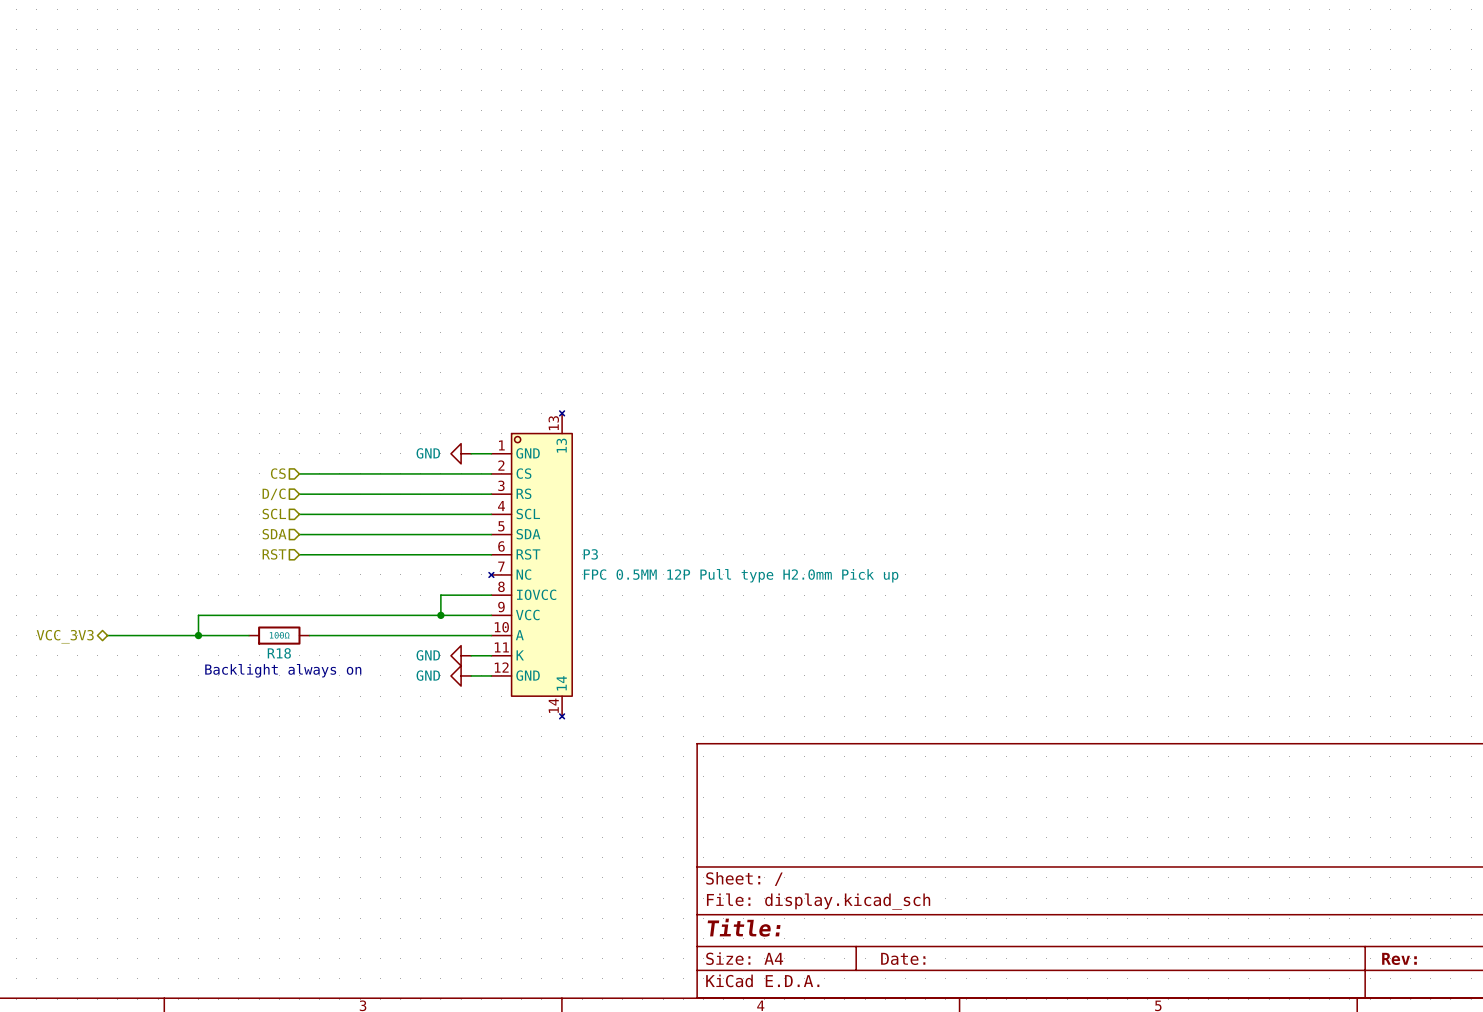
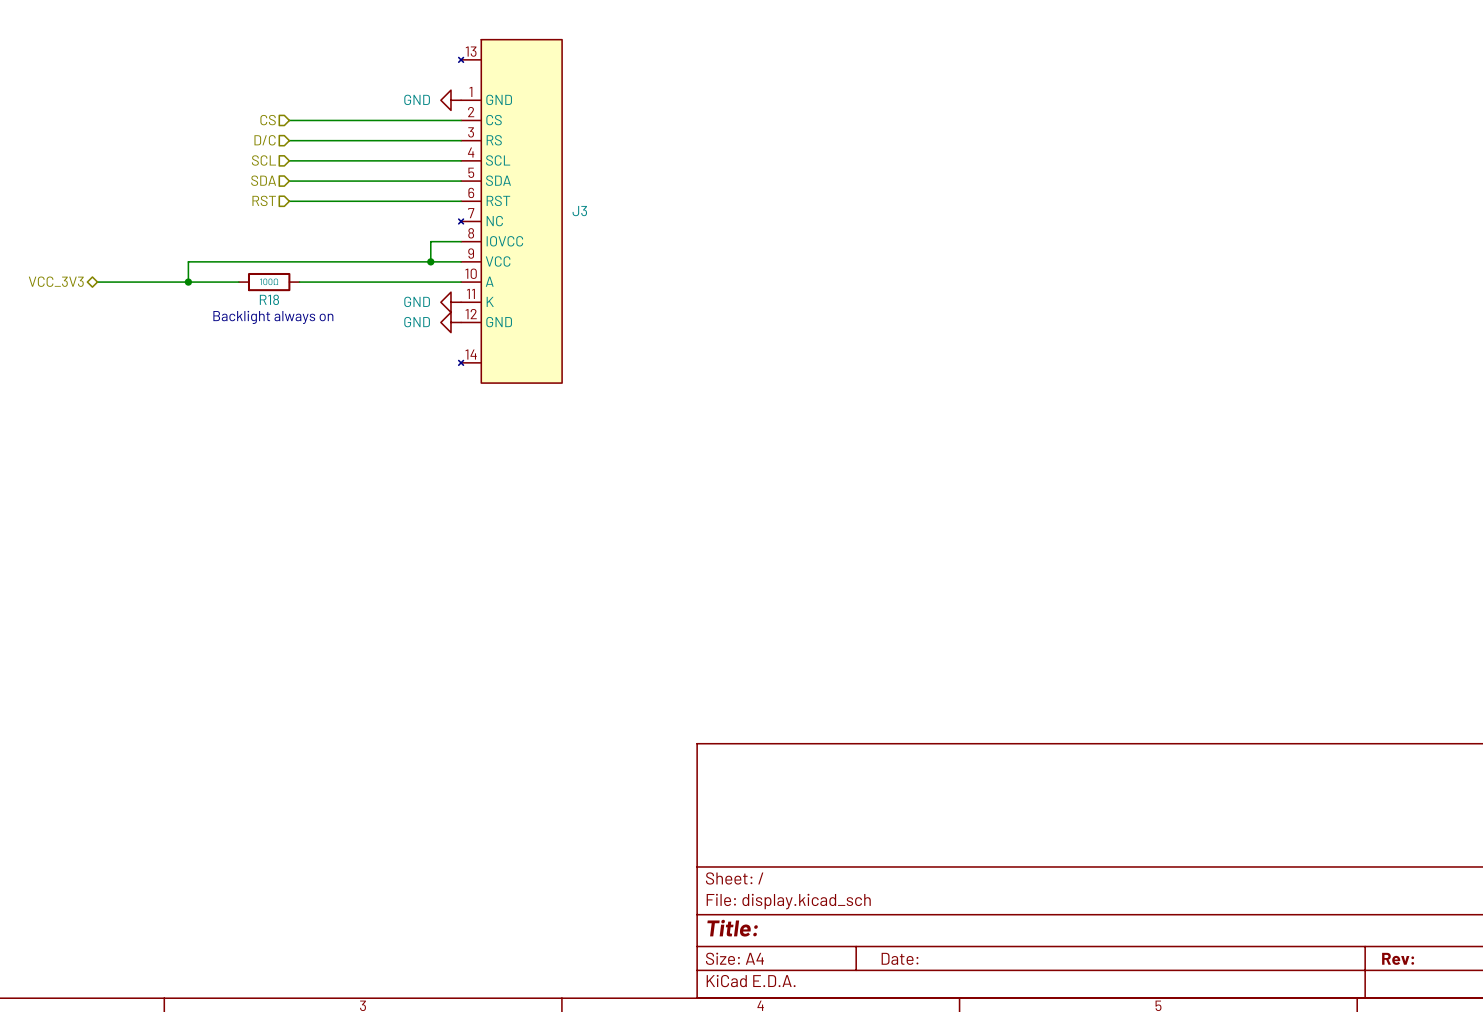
power symbol: none -> GND (450, 100)
hierarchical label: none -> CS (268, 120)
wire: none -> (289, 120) (461, 120)
hierarchical label: none -> D/C (265, 140)
wire: none -> (289, 140) (461, 140)
hierarchical label: none -> SCL (263, 160)
wire: none -> (289, 160) (461, 160)
hierarchical label: none -> SDA (263, 180)
wire: none -> (289, 181) (461, 181)
hierarchical label: none -> RST (264, 200)
wire: none -> (289, 201) (461, 201)
J3: none -> (510, 211)
wire: none -> (461, 241) (430, 241) (430, 261)
junction: none -> (430, 261)
wire: none -> (461, 261) (188, 261) (188, 282)
wire: none -> (97, 282) (238, 282)
junction: none -> (188, 282)
wire: none -> (299, 282) (461, 282)
hierarchical label: none -> VCC_3V3 (56, 281)
power symbol: none -> GND (450, 302)
text: none -> Backlight always on (273, 317)
power symbol: none -> GND (450, 322)
power symbol: GND (461, 453) -> none
wire: (471, 453) (491, 453) -> none
hierarchical label: CS (278, 473) -> none
wire: (299, 473) (491, 473) -> none
hierarchical label: D/C (274, 494) -> none
wire: (299, 494) (491, 494) -> none
hierarchical label: SCL (274, 513) -> none
wire: (299, 514) (491, 514) -> none
hierarchical label: SDA (274, 534) -> none
wire: (299, 534) (491, 534) -> none
hierarchical label: RST (274, 554) -> none
wire: (299, 554) (491, 554) -> none
P3: FPC 0.5MM 12P Pull type H2.0mm Pick up (530, 564) -> none
wire: (491, 595) (440, 595) (440, 615) -> none
junction: (440, 615) -> none
wire: (491, 615) (198, 615) (198, 635) -> none
wire: (107, 635) (248, 635) -> none
junction: (198, 635) -> none
R18 position: (279, 635) -> (269, 282)
wire: (309, 635) (491, 635) -> none
hierarchical label: VCC_3V3 (65, 636) -> none
power symbol: GND (461, 655) -> none
wire: (471, 655) (491, 655) -> none
text: Backlight always on (283, 670) -> none
power symbol: GND (461, 675) -> none
wire: (471, 675) (491, 675) -> none

